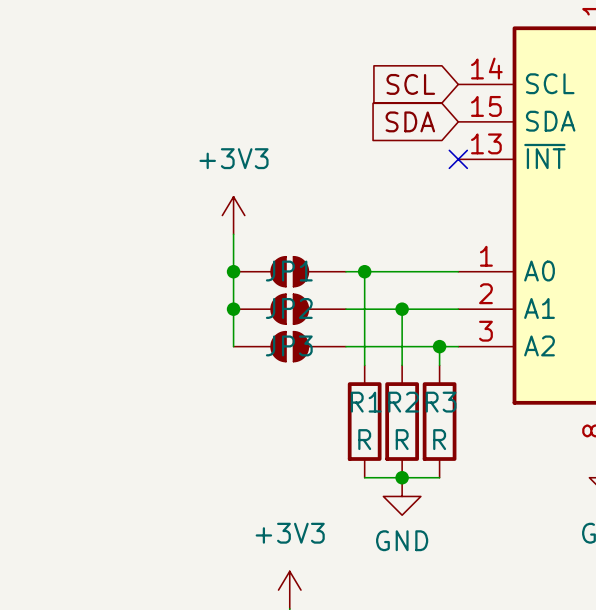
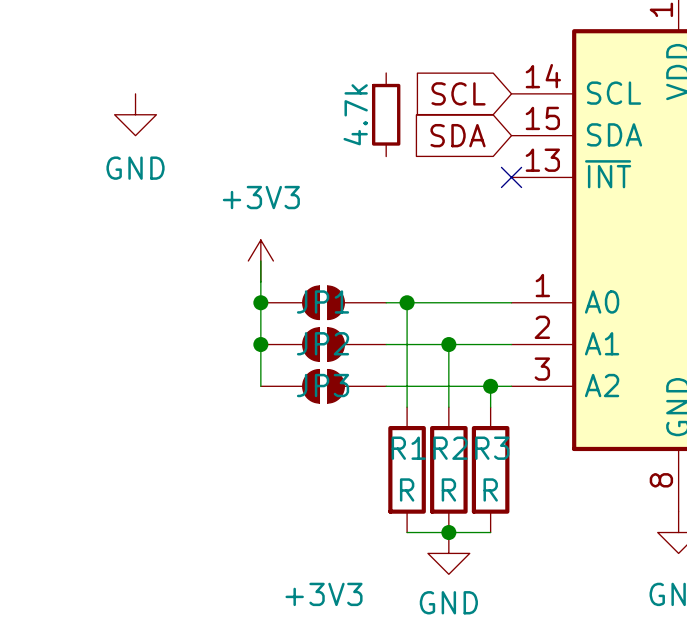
power symbol: none -> GND (135, 114)
part: none -> 4.7k (386, 114)
power symbol position: +3V3 (233, 215) -> +3V3 (260, 260)

